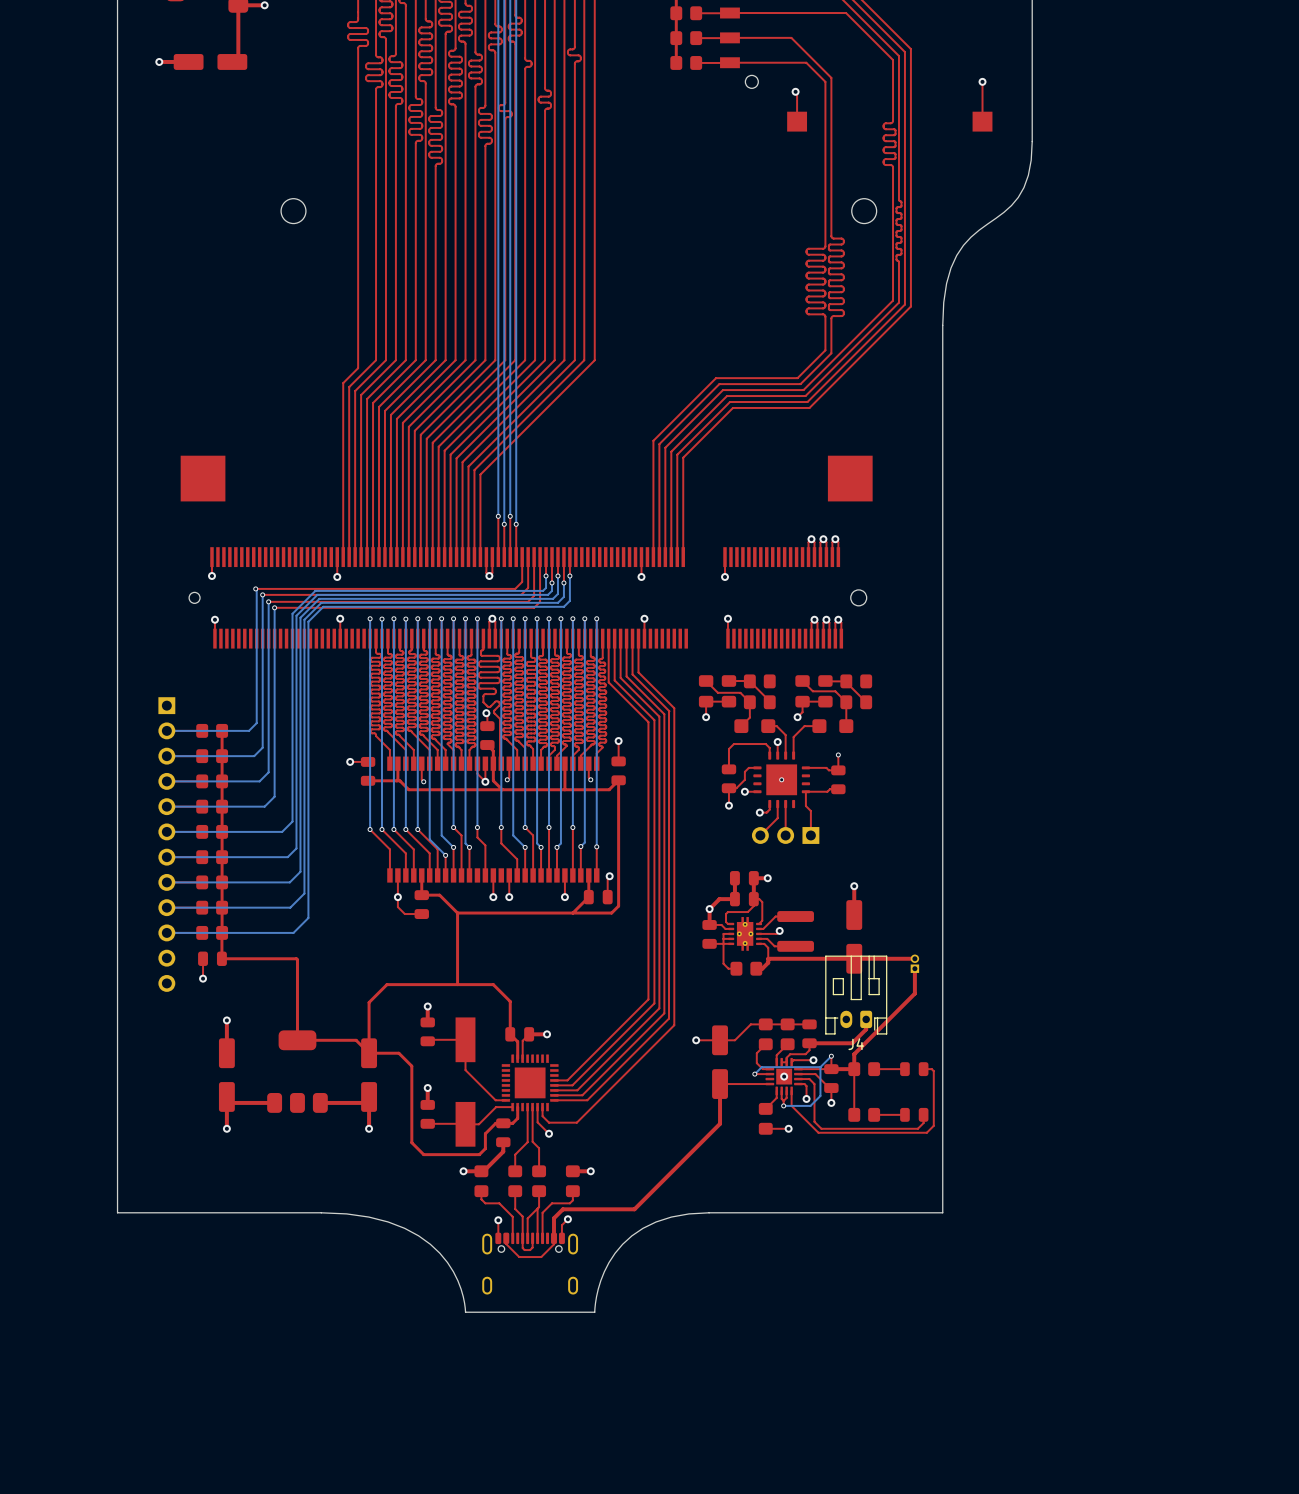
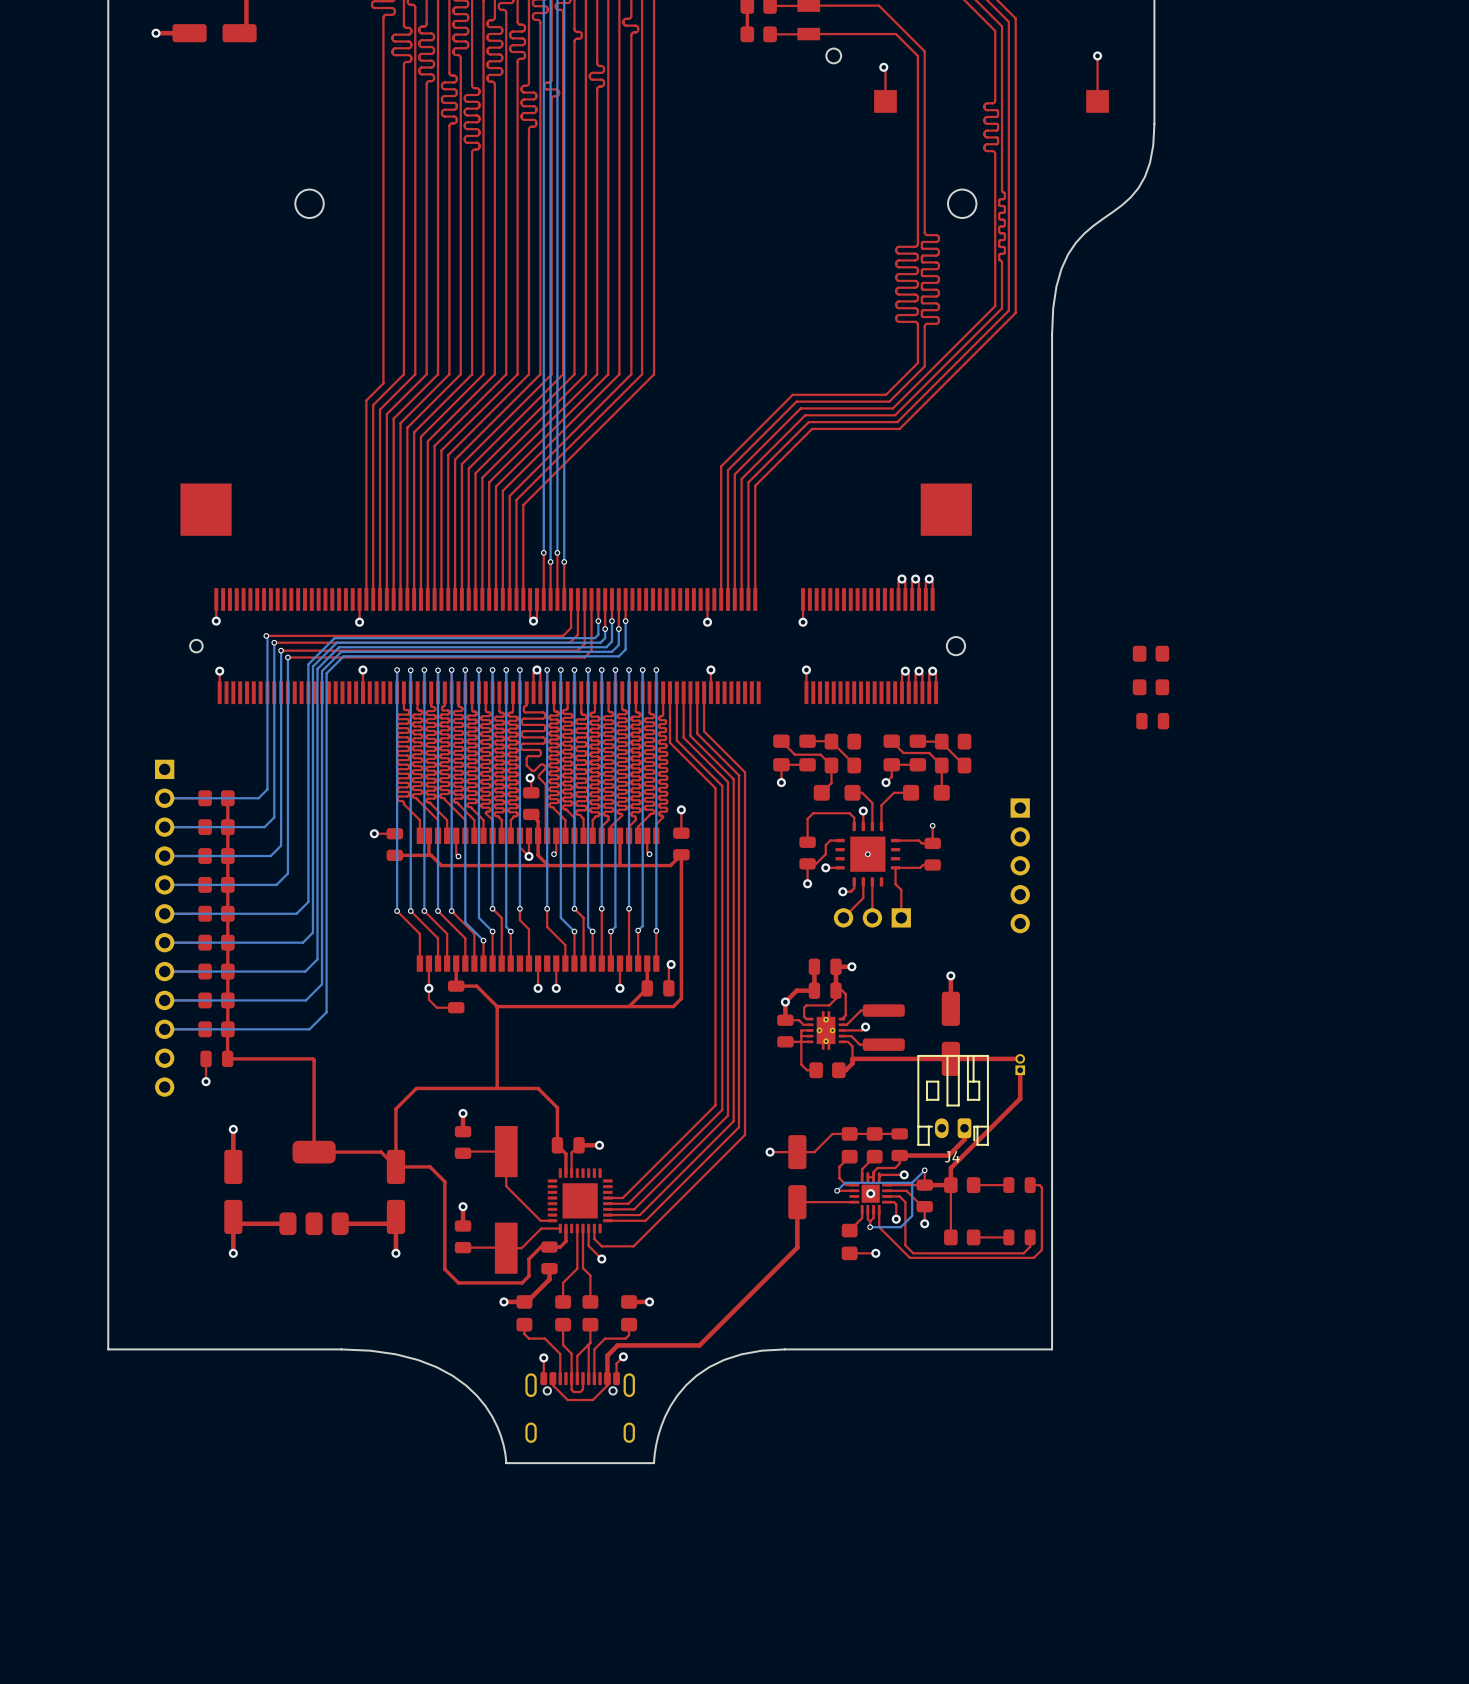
part: none -> (1150, 653)
part: none -> (1150, 687)
part: none -> (1152, 721)
part: none -> (1020, 865)

